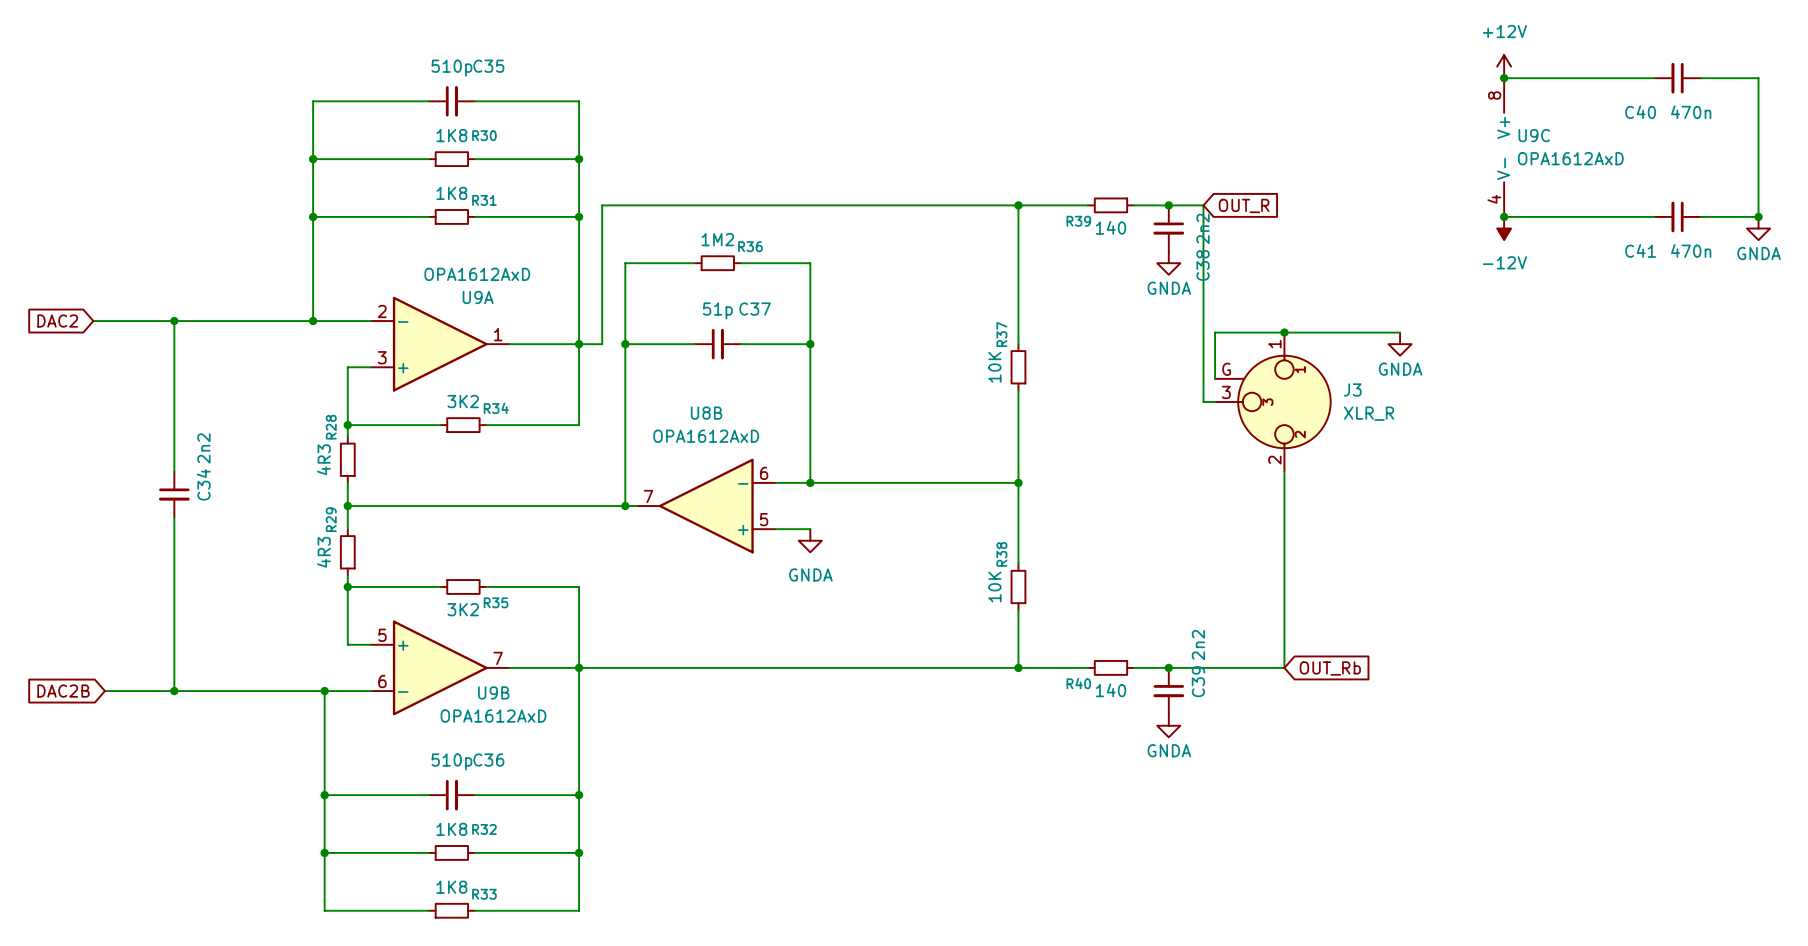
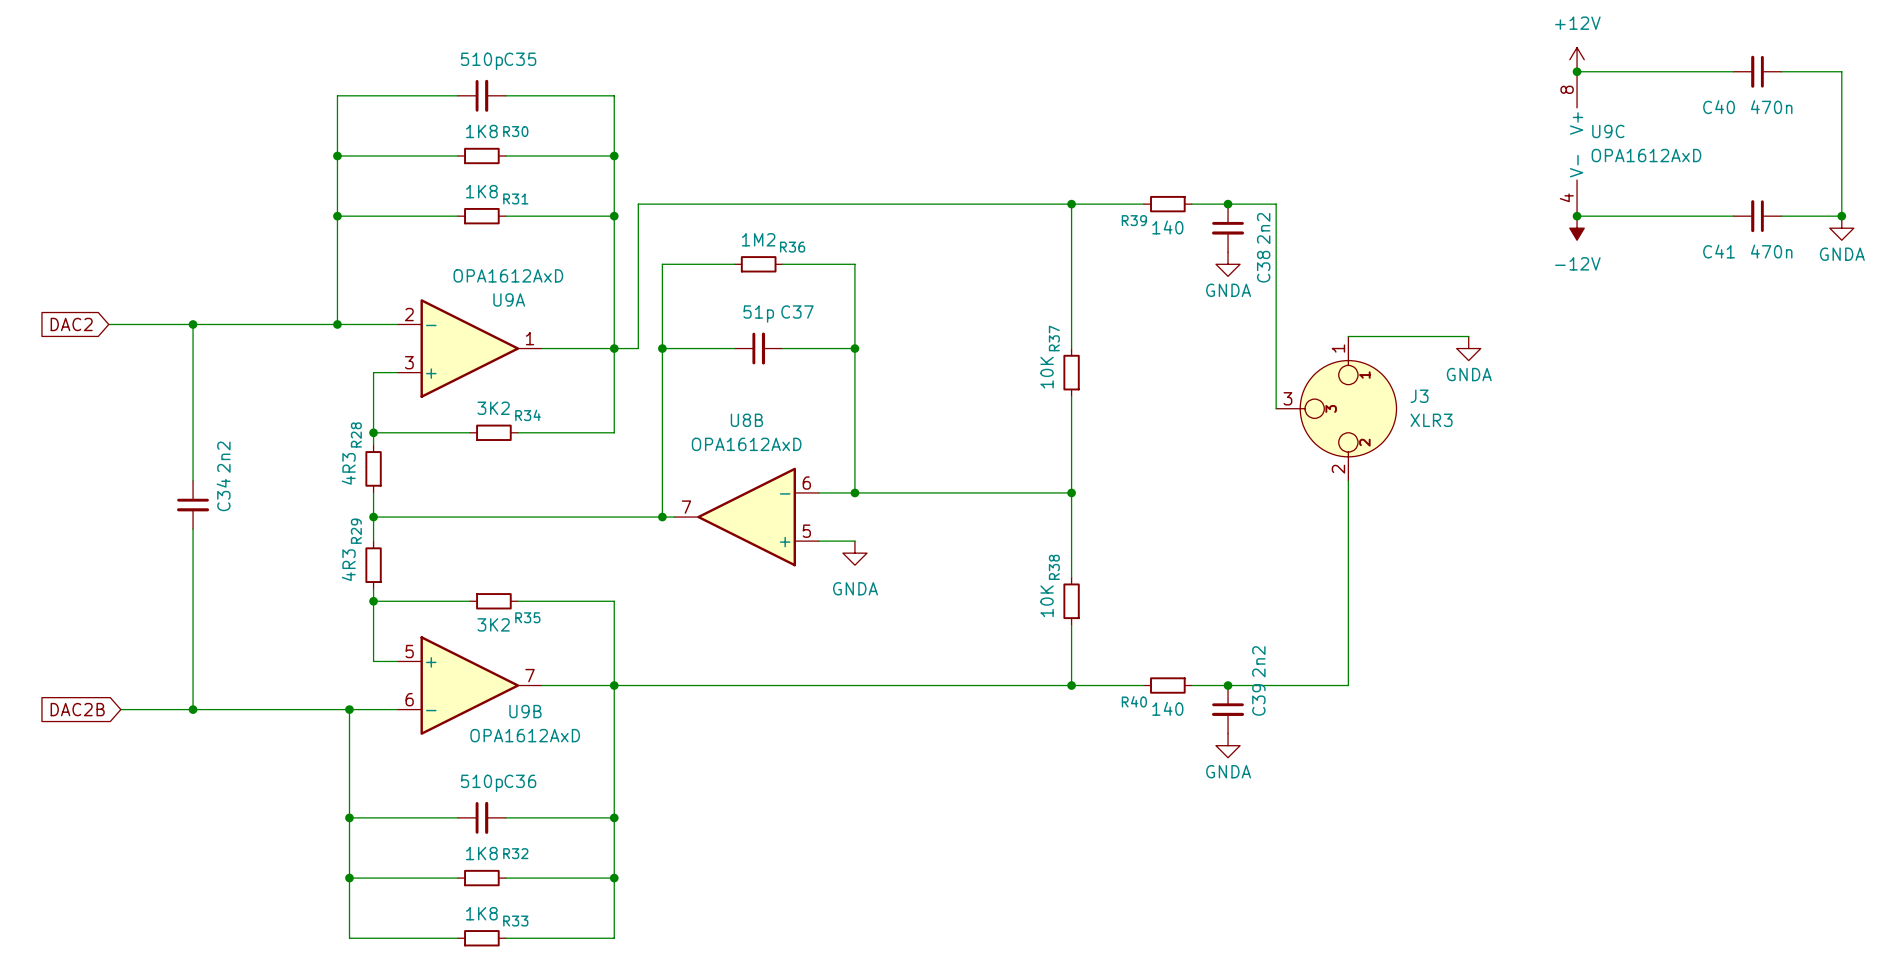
wire: (1203, 205) (1203, 401) (1215, 401) -> (1264, 204) (1276, 204) (1276, 336)
global label: OUT_R (1244, 205) -> none
wire: (1215, 332) (1284, 332) -> none
J3 symbol: [1215, 332, 1331, 472] -> [1276, 336, 1397, 481]
junction: (1284, 332) -> none
wire: none -> (1276, 384) (1276, 408)
J3 value: XLR_R (1369, 413) -> XLR3 (1431, 420)
global label: OUT_Rb (1330, 668) -> none

